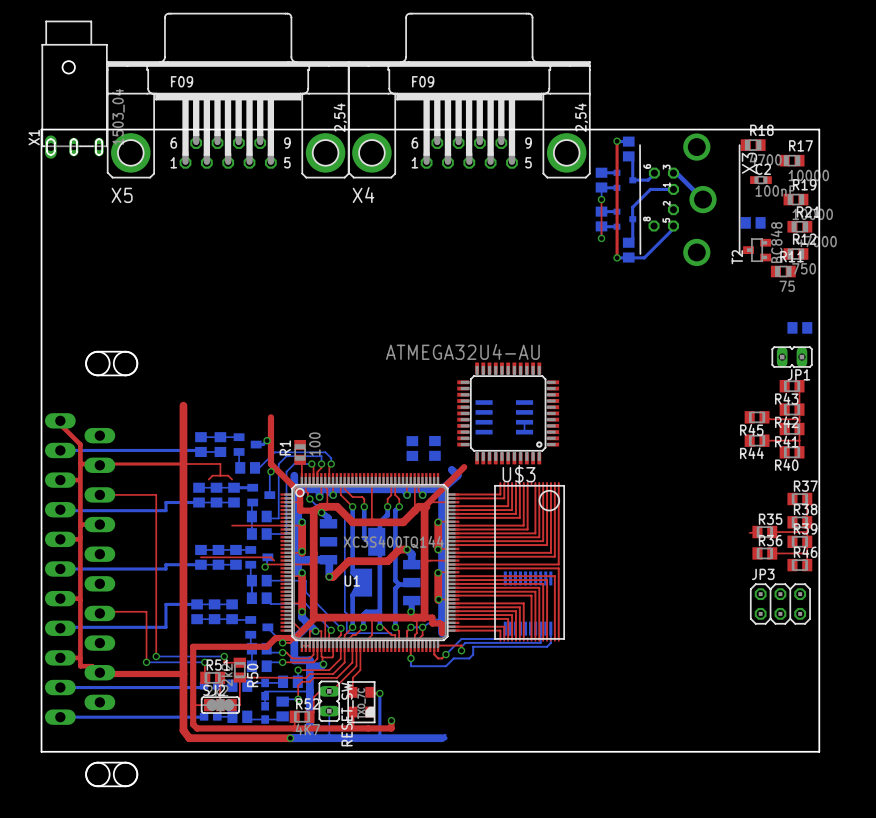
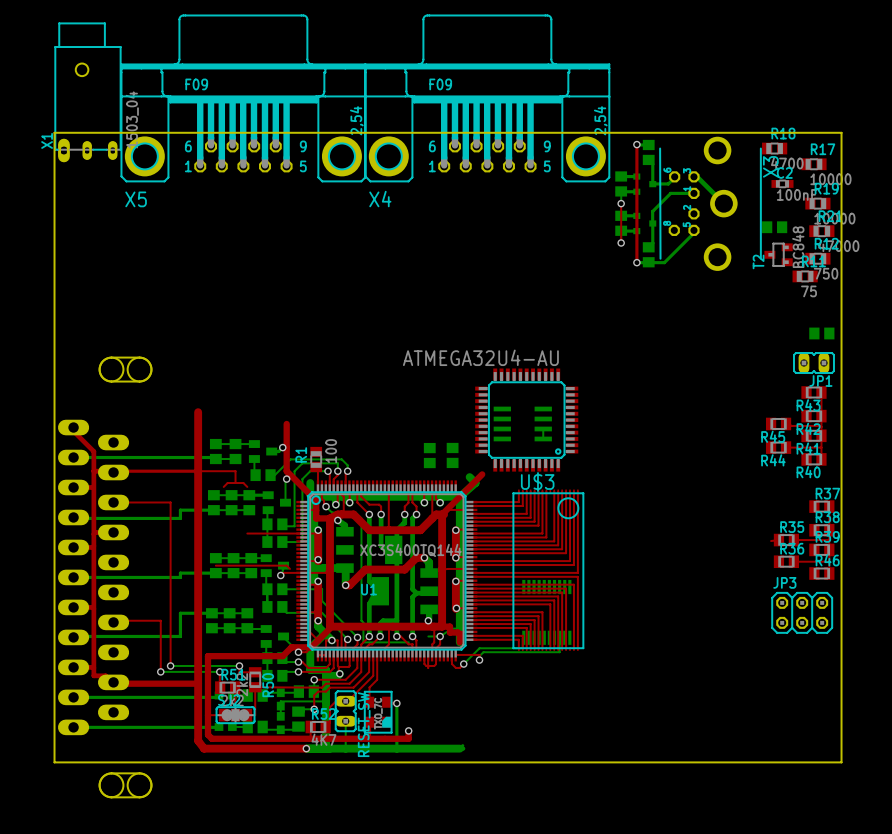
top track: (410, 627) (407, 631) (407, 646) -> (436, 655) (434, 665) (426, 665) (424, 664) (424, 656)
via: (410, 627) -> none
bottom track: (550, 628) (550, 643) (547, 646) (473, 646) (473, 654) (469, 658) (453, 658) (445, 666) (410, 666) (410, 658) -> none
via: (410, 658) -> none

